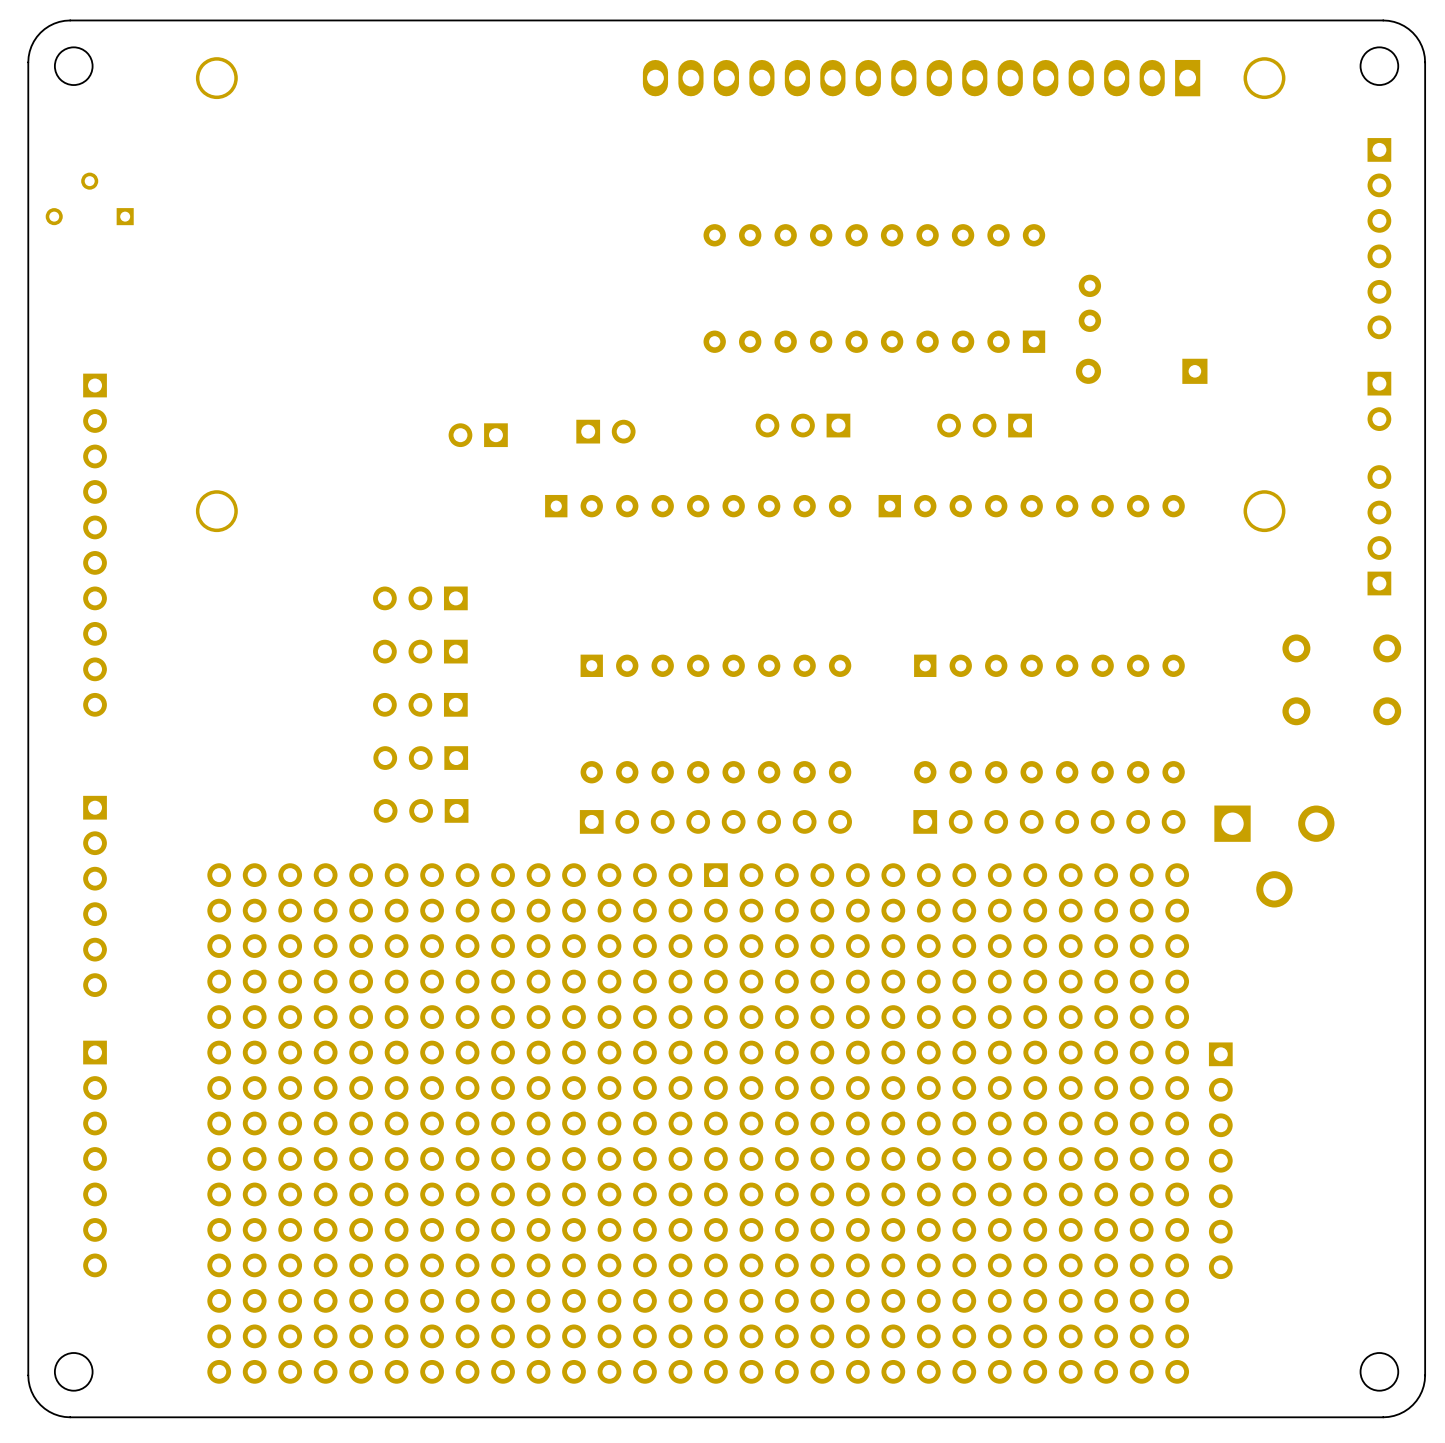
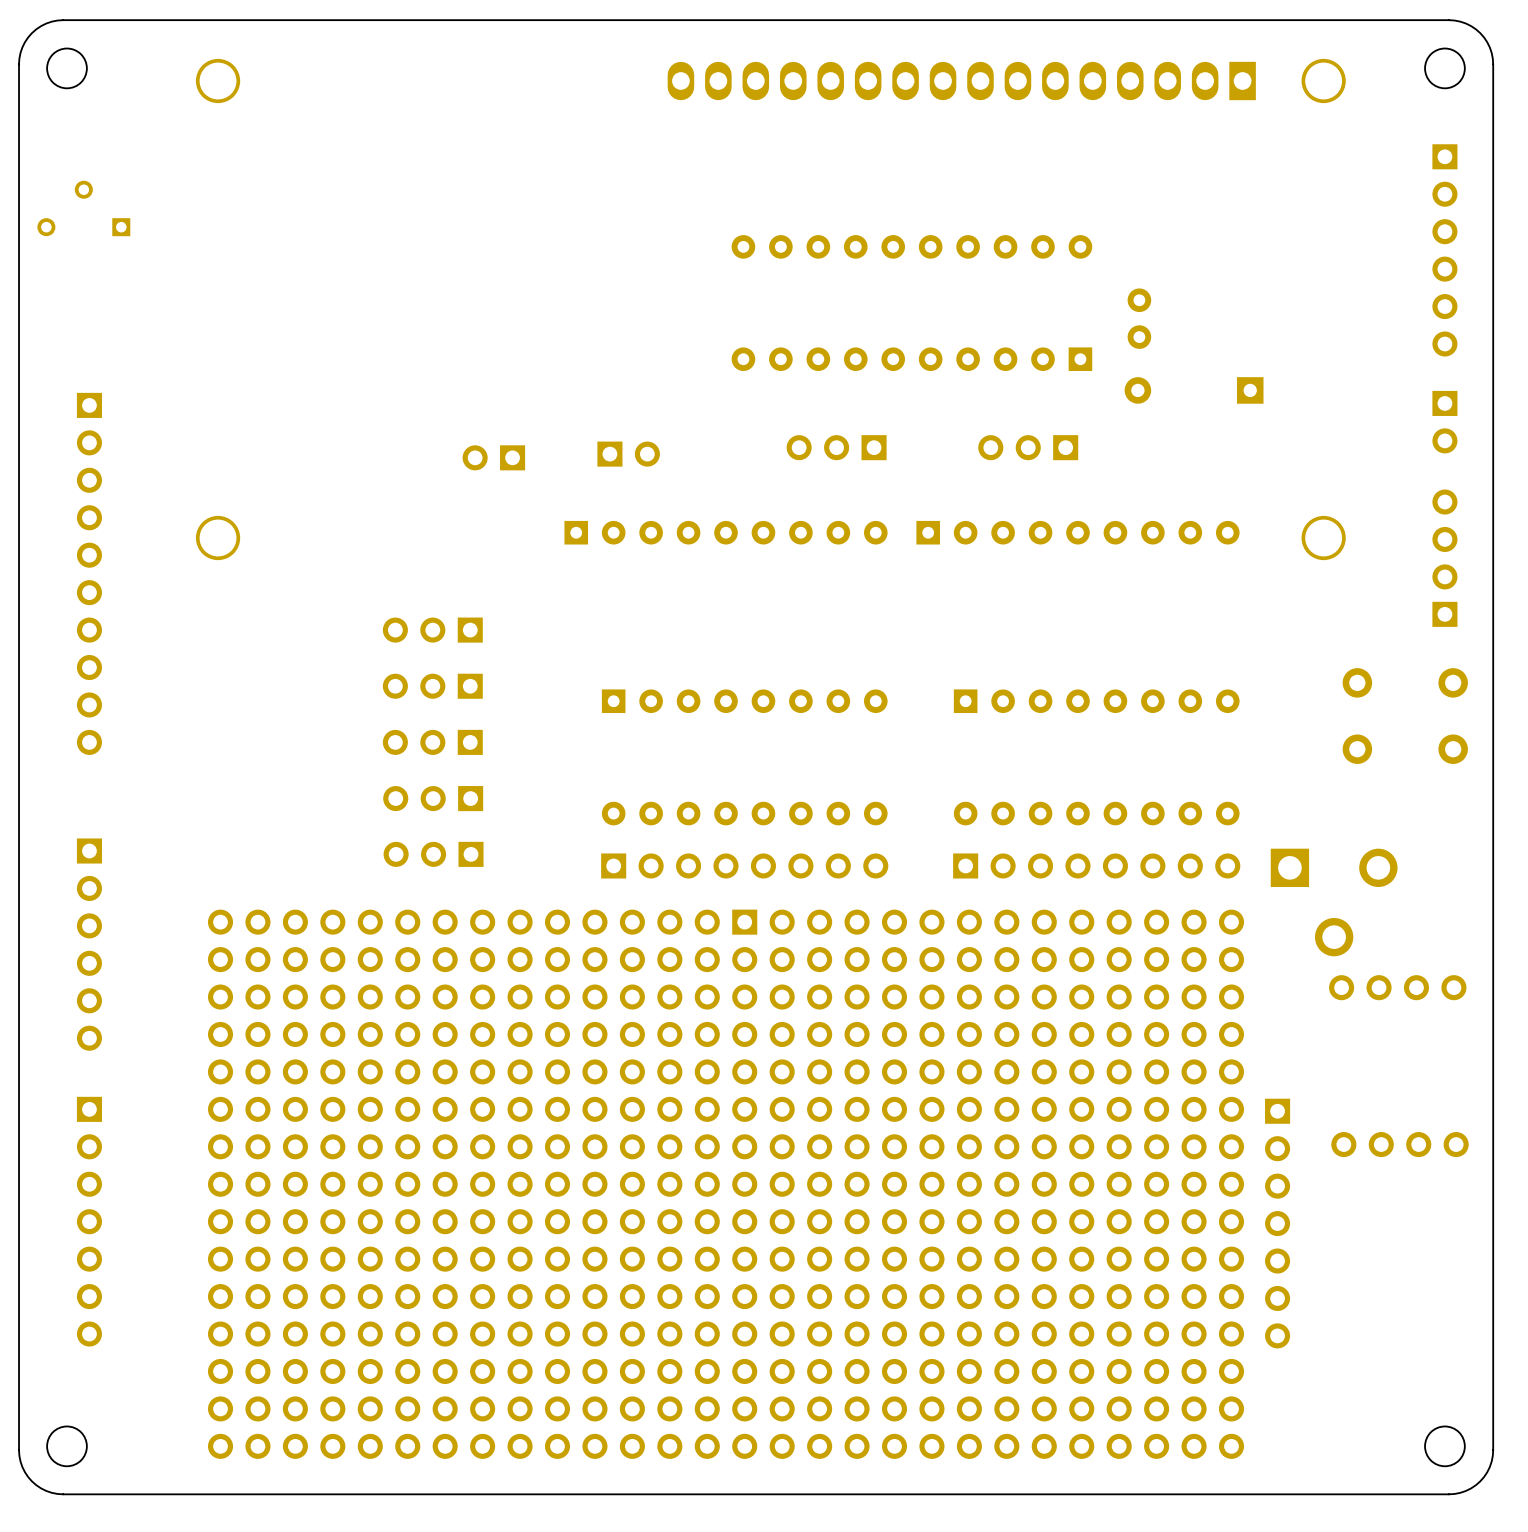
part: none -> (1397, 987)
part: none -> (1400, 1144)

